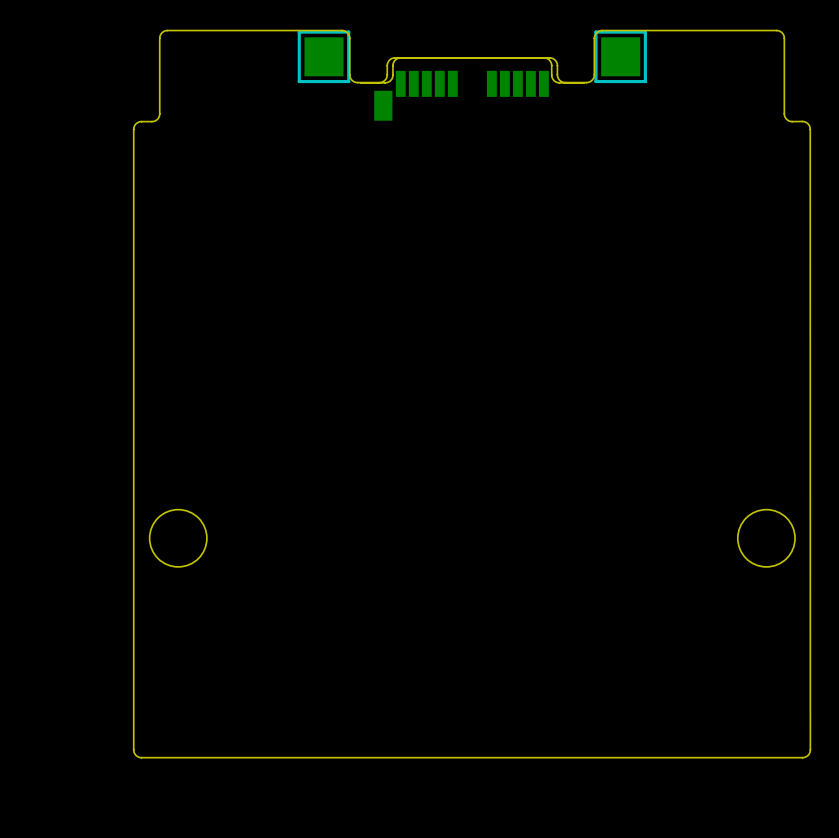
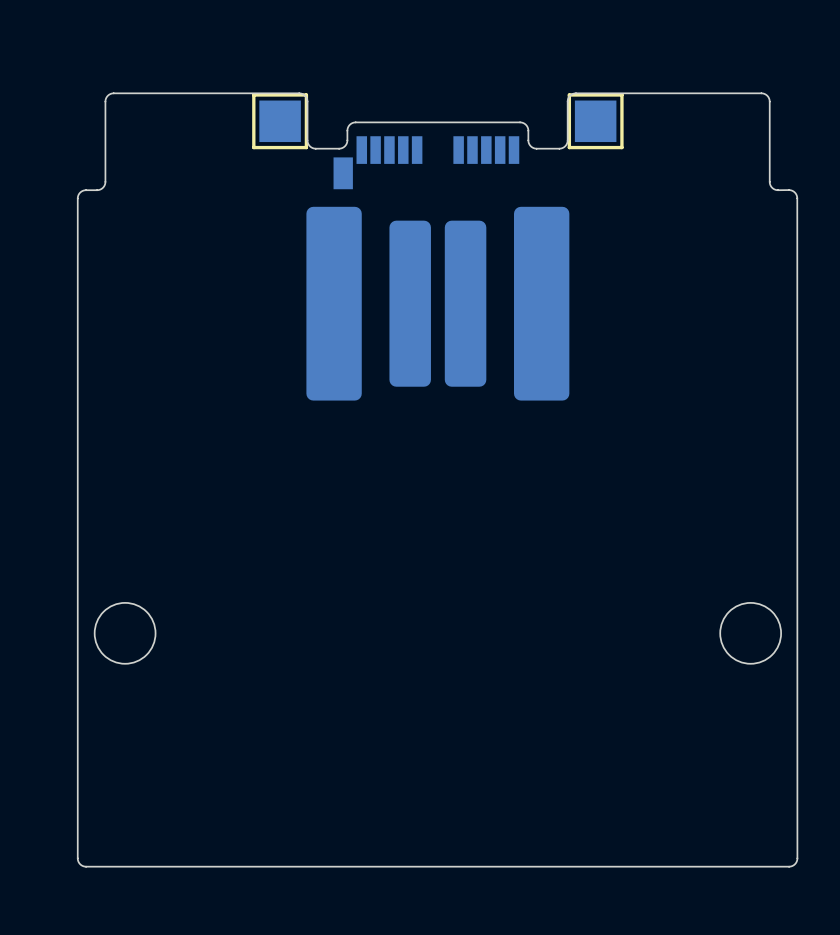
part footprint: [359, 57, 585, 121] -> [333, 136, 520, 190]
part: none -> (437, 303)

